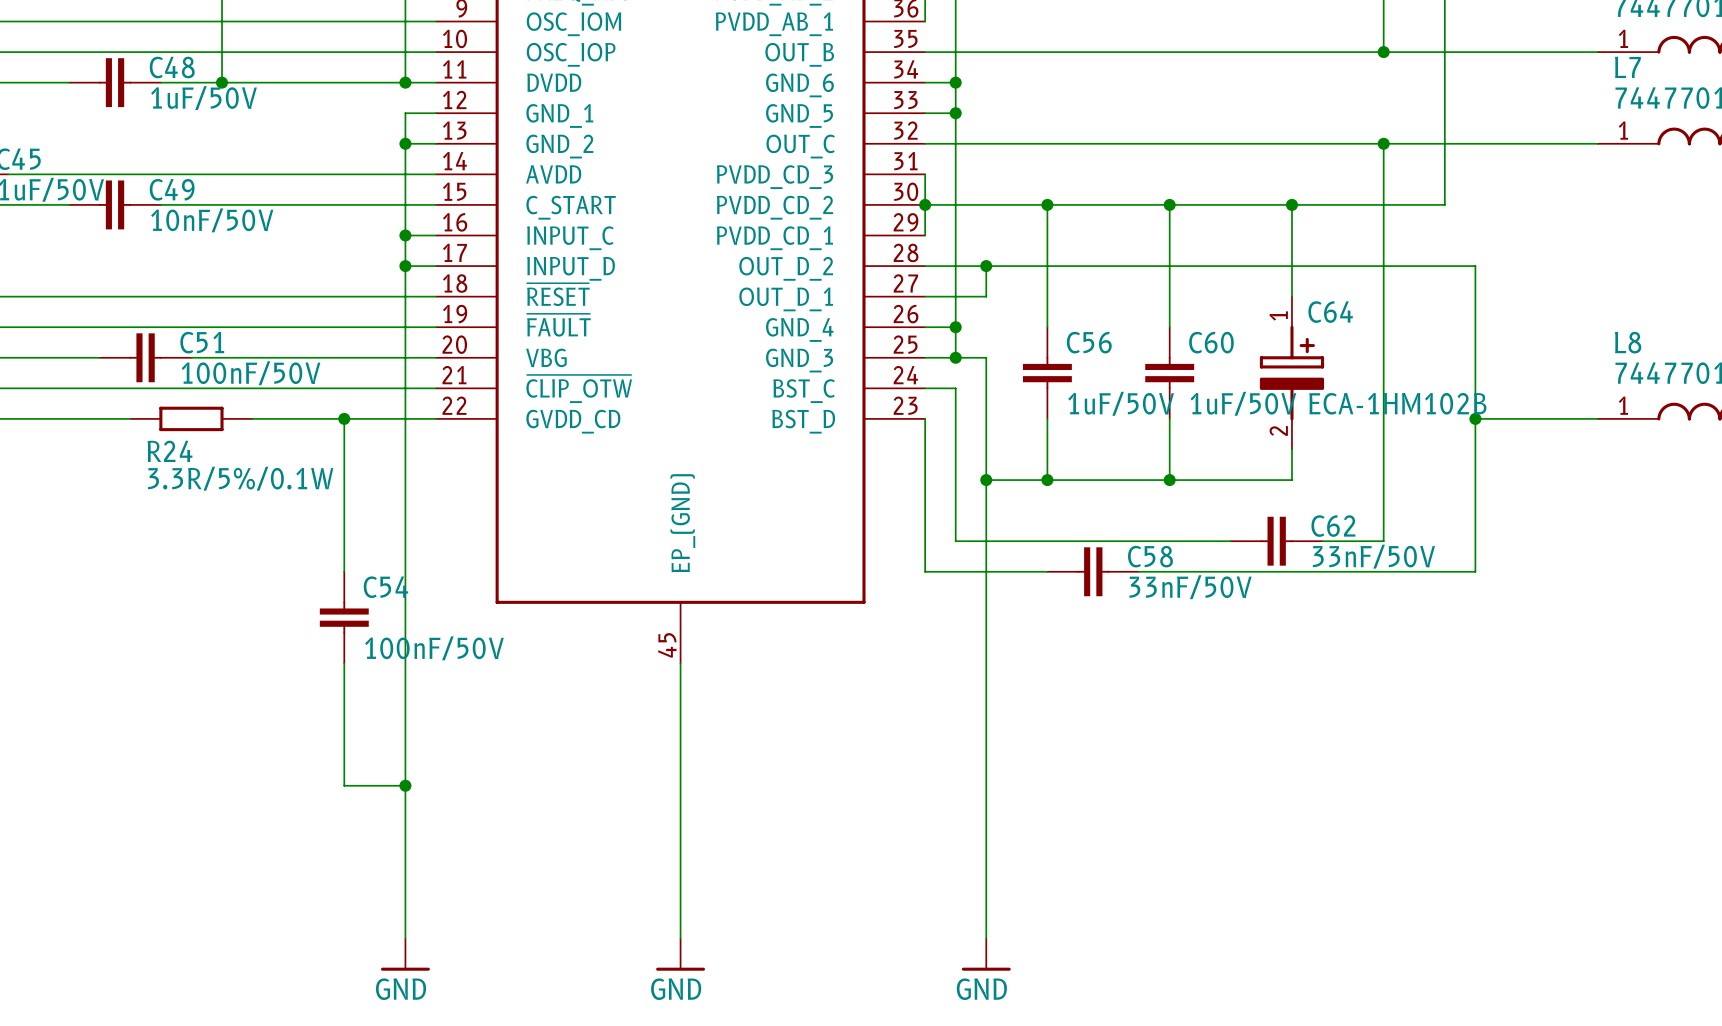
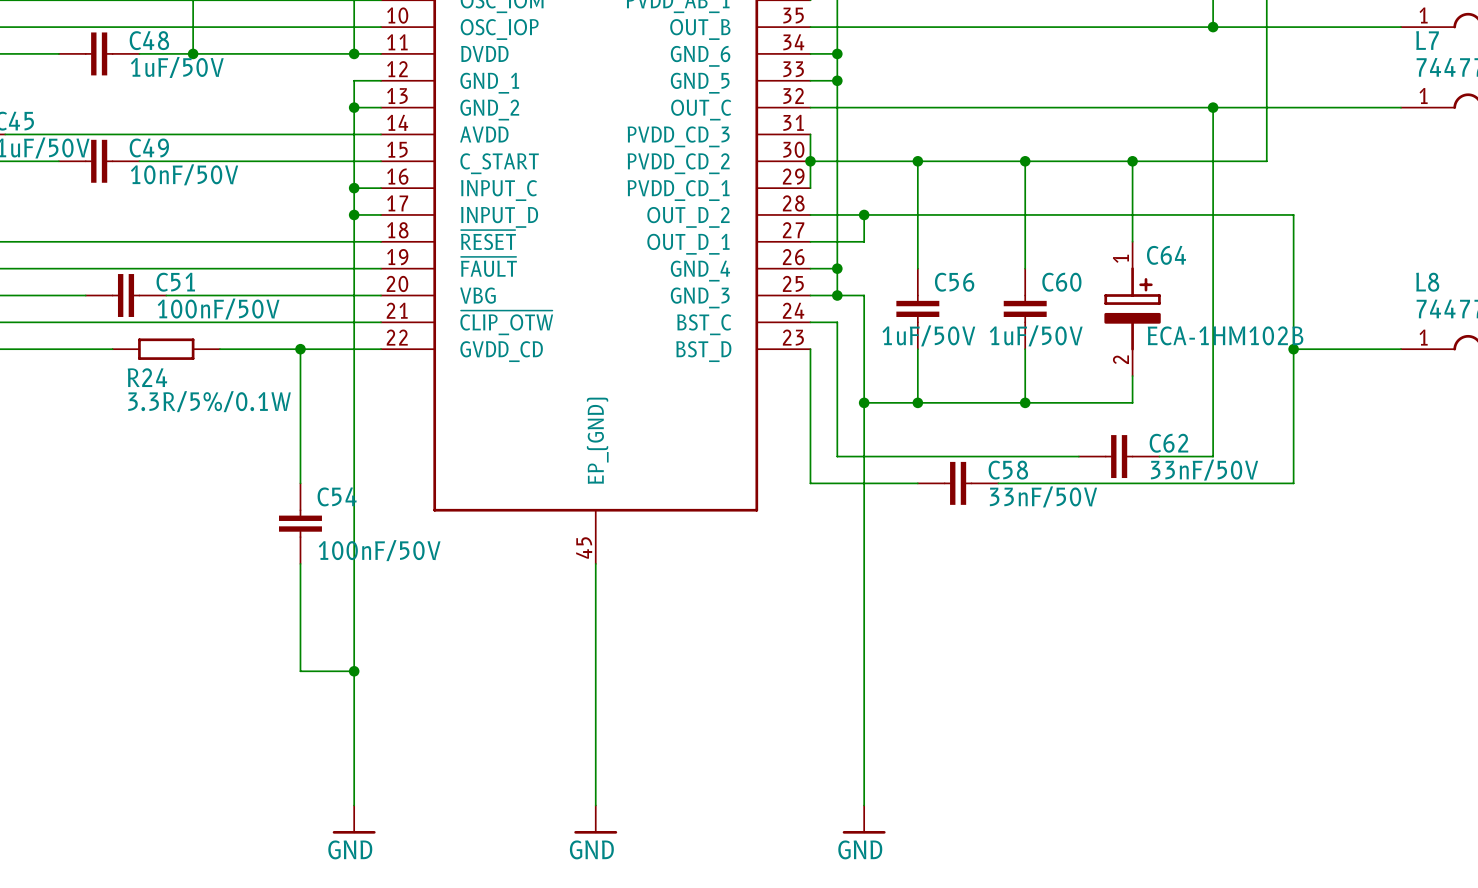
C56 value position: 1uF/50V (1121, 403) -> 1uF/50V (928, 335)
C60 value position: 1uF/50V (1243, 403) -> 1uF/50V (1036, 335)

